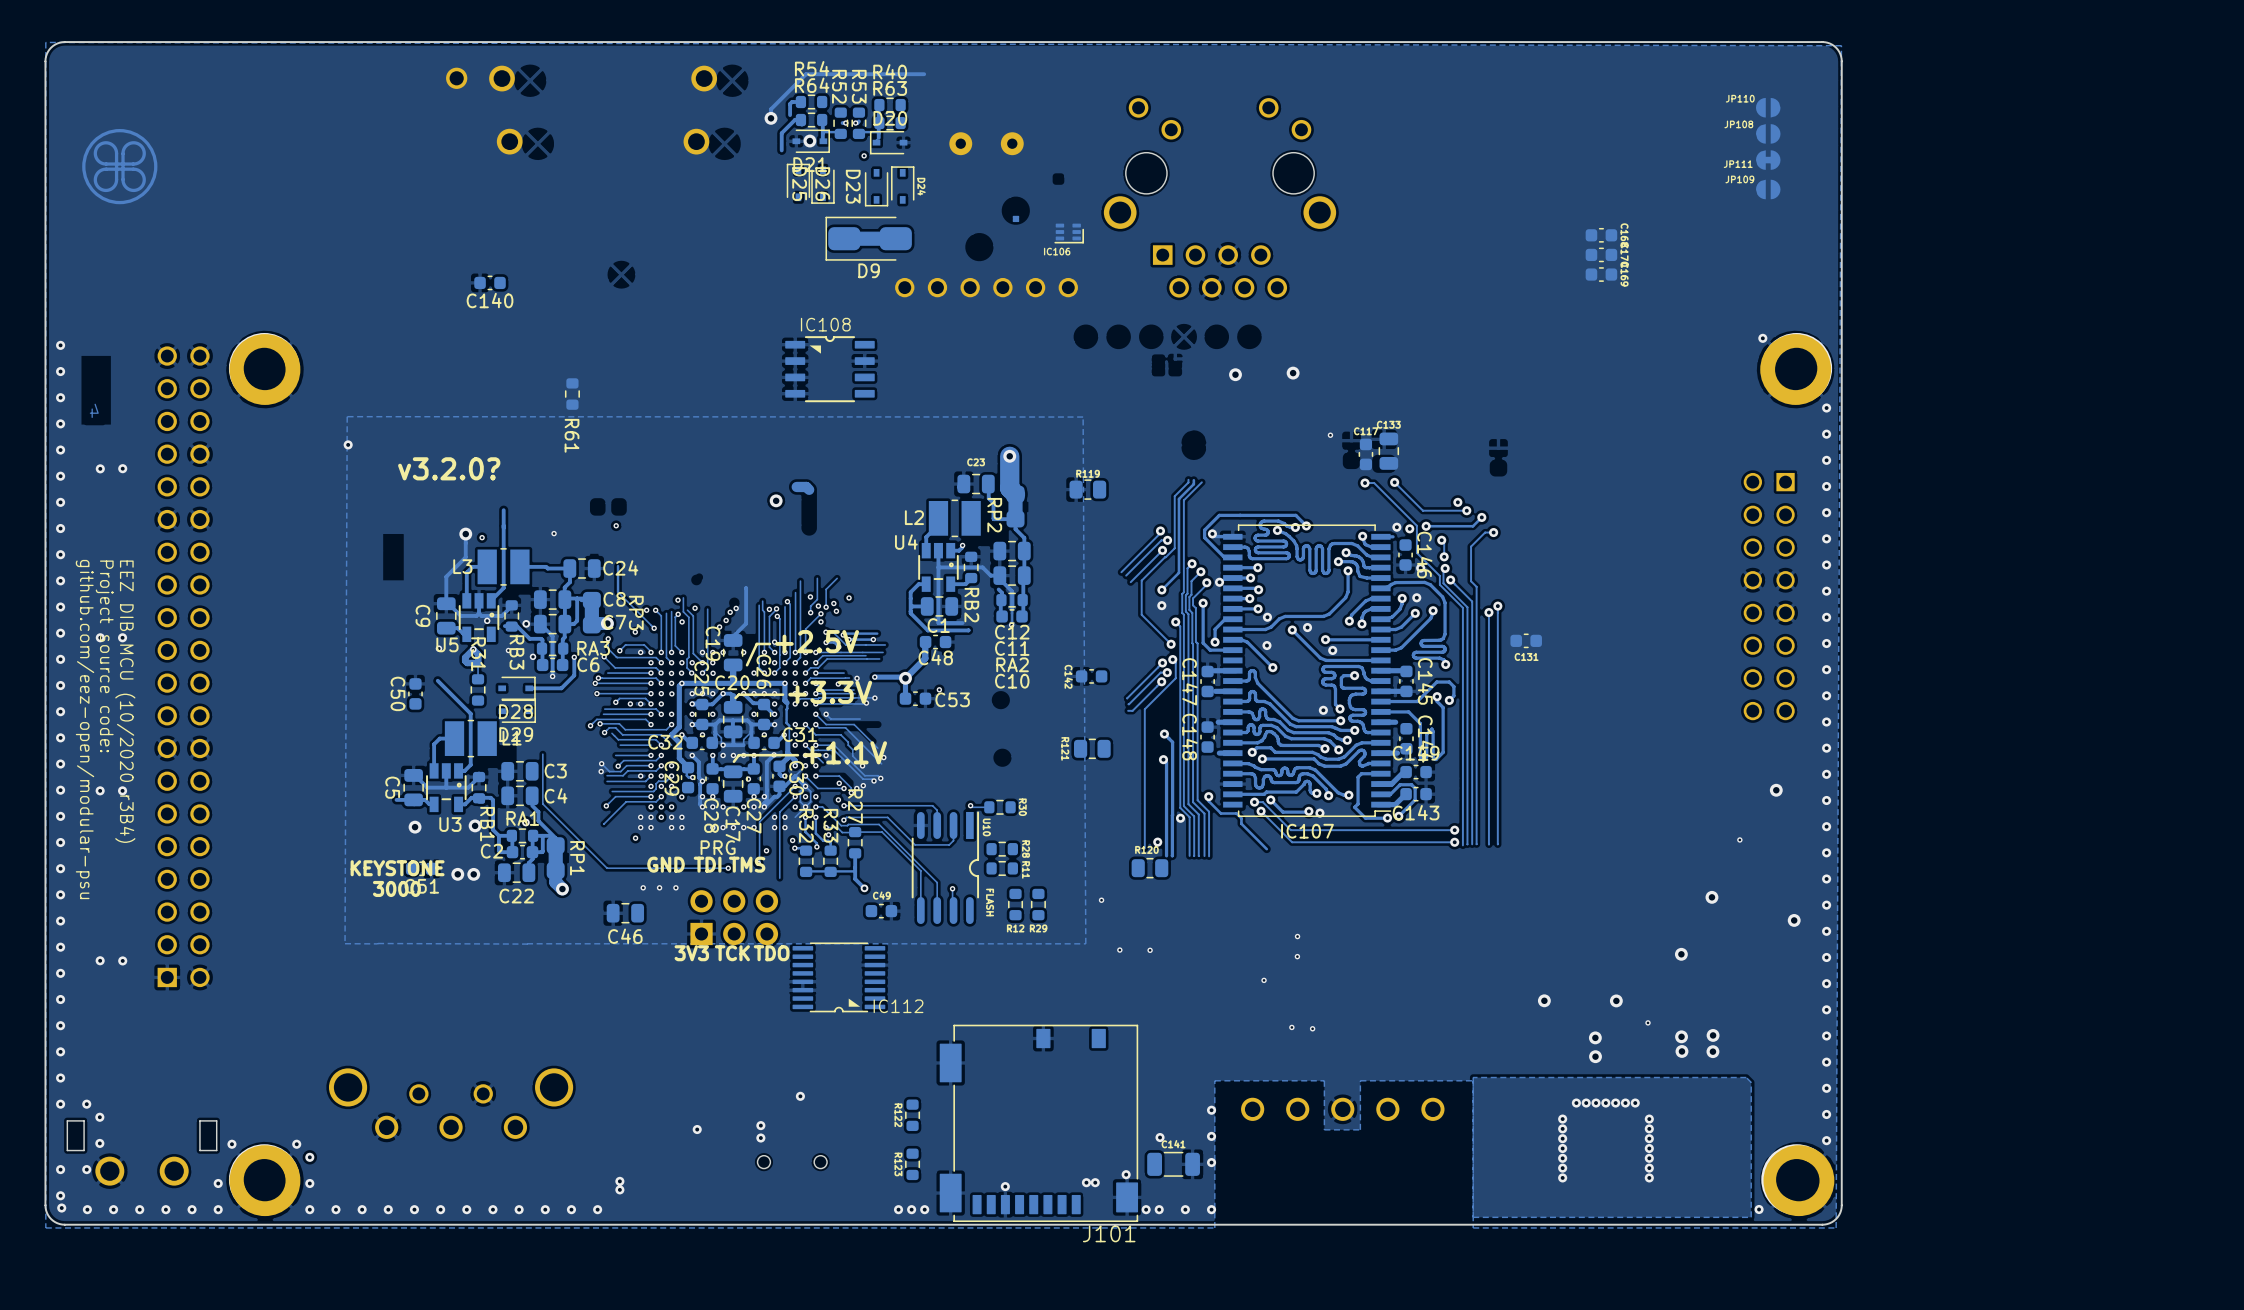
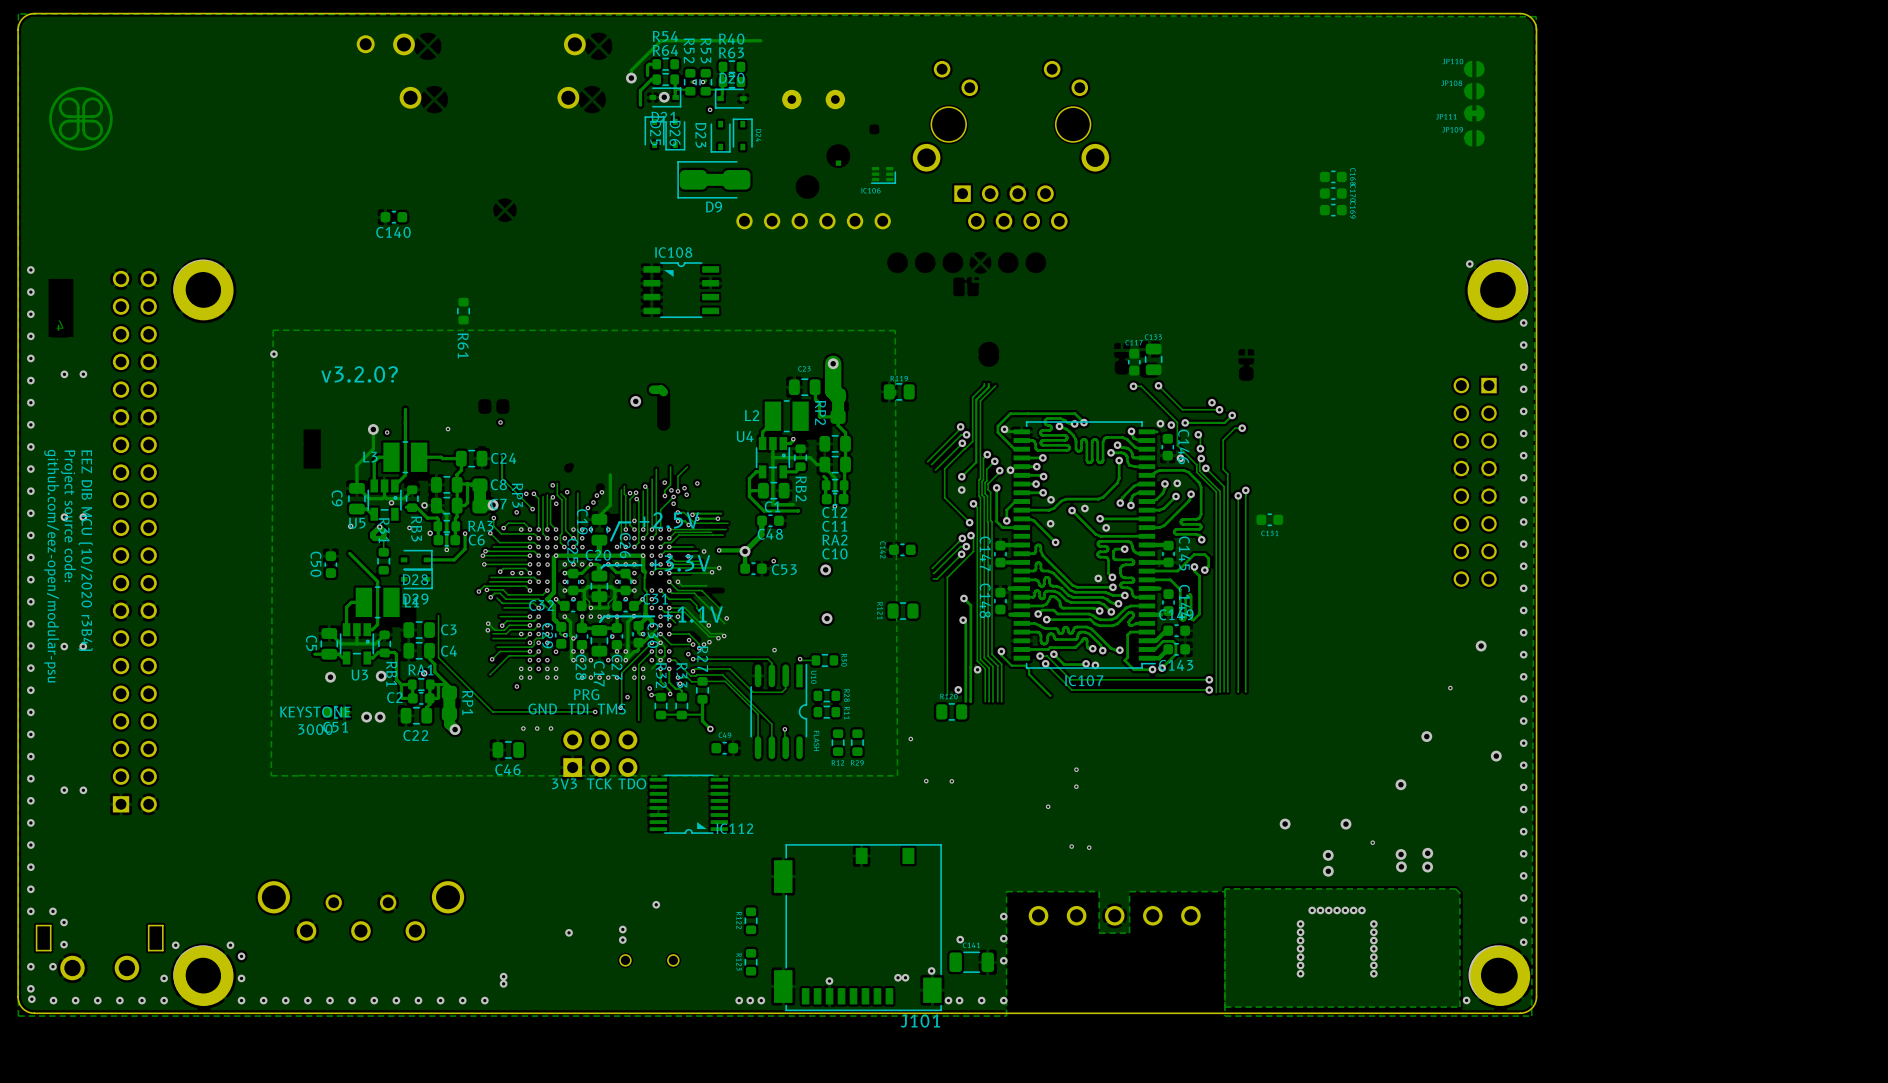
via: (1293, 373) -> none
via: (1235, 374) -> none
via: (1330, 435) -> none
via: none -> (825, 569)
via: none -> (827, 618)
via: none -> (774, 650)

